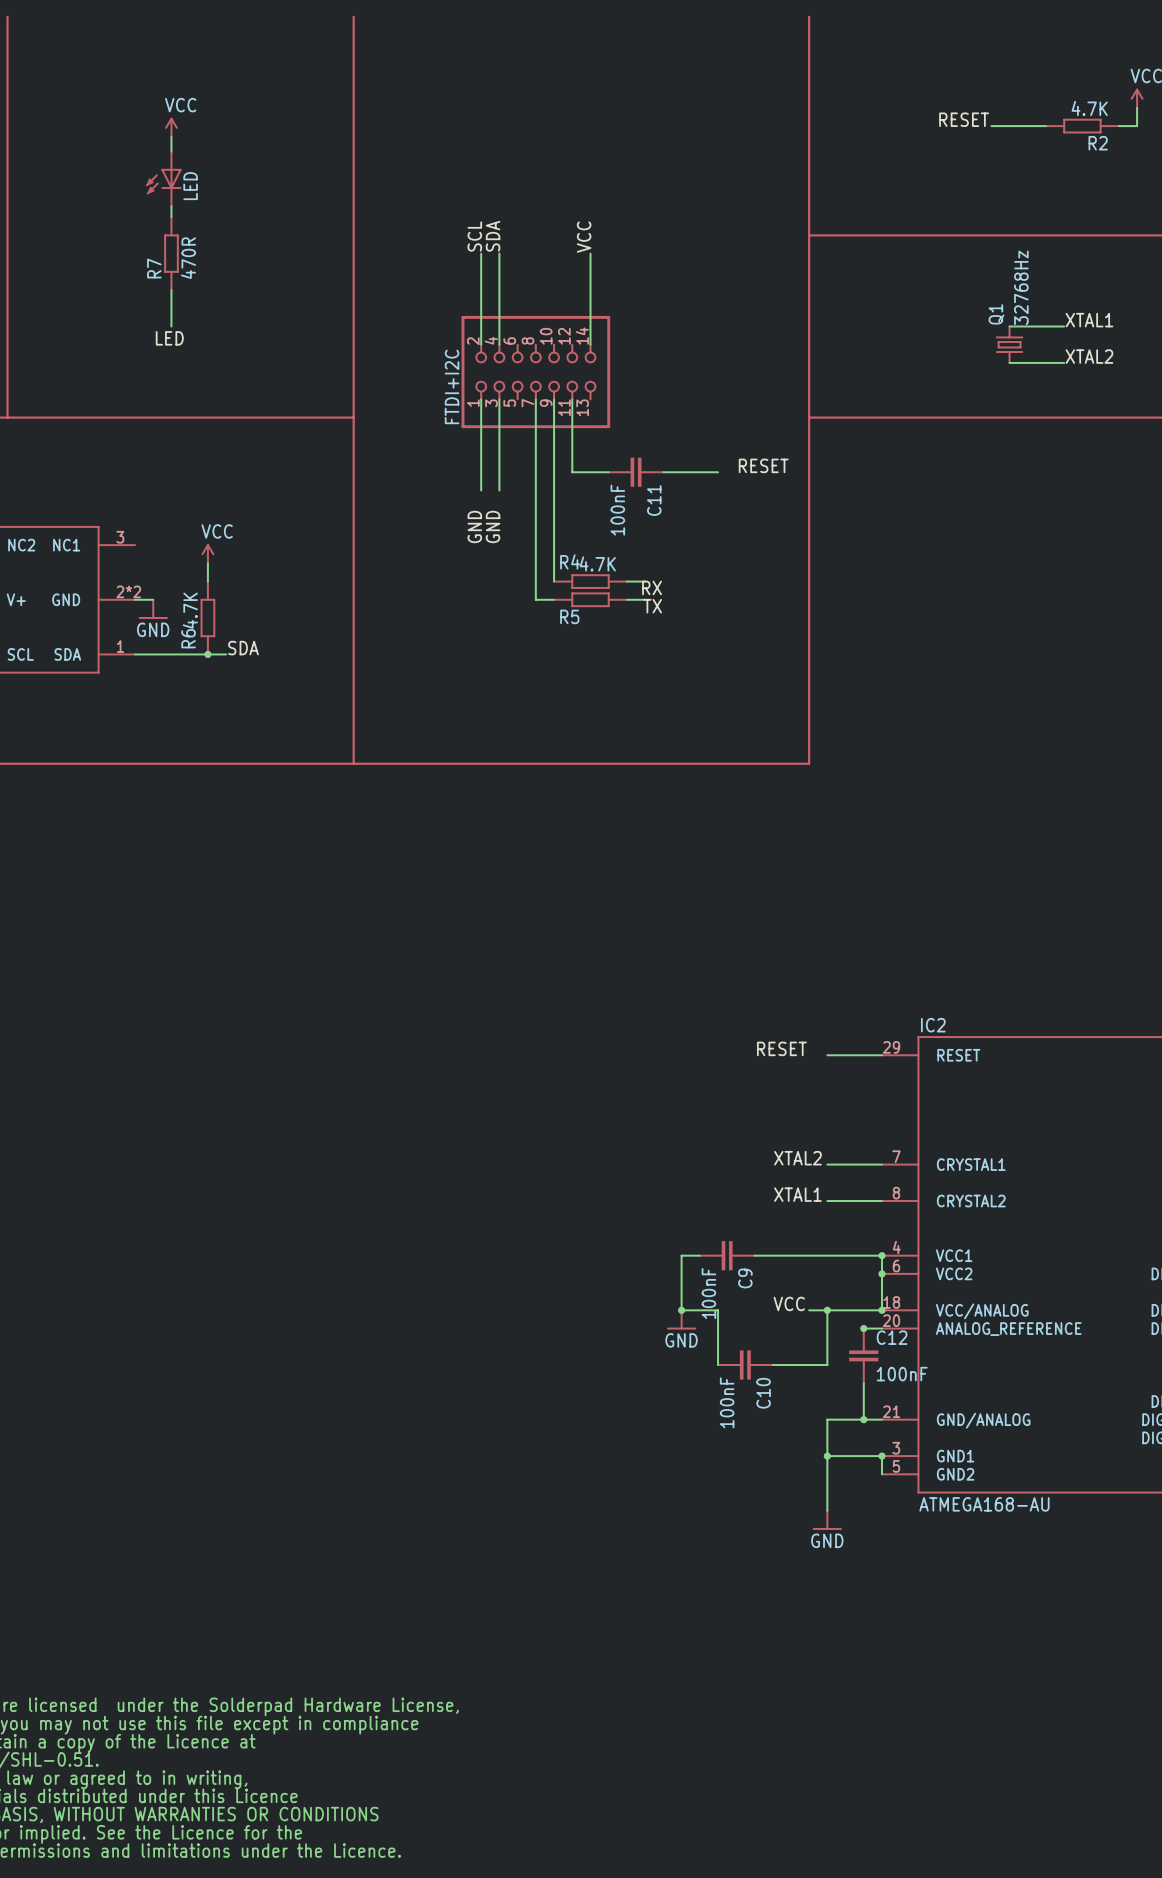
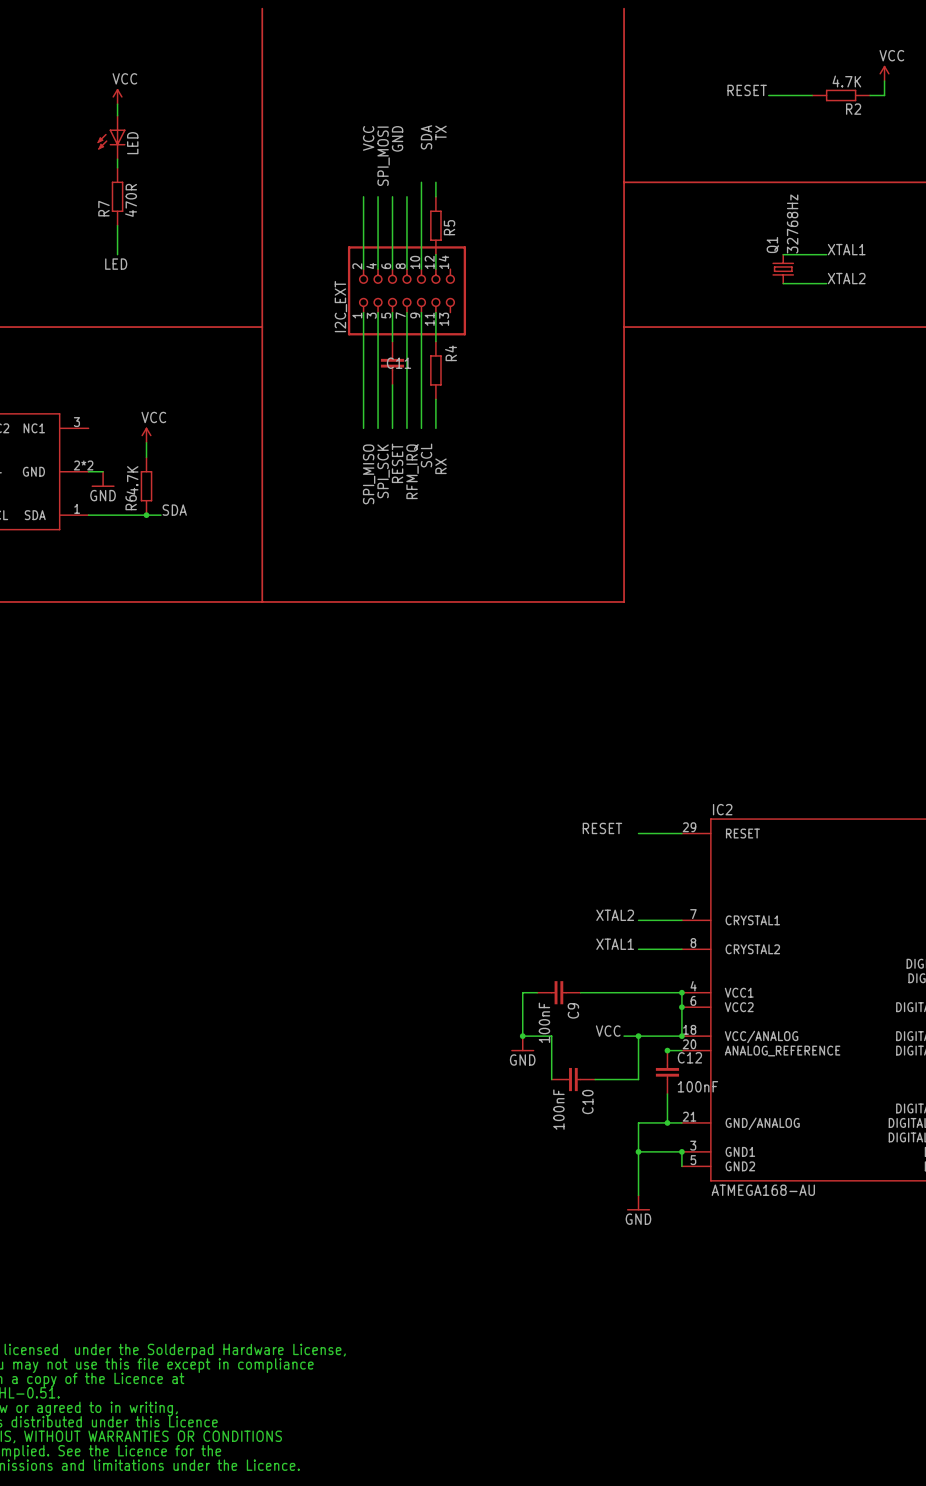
label: none -> TX (440, 133)
label: none -> GND (397, 138)
label: none -> SPI_MOSI (383, 156)
wire: none -> (421, 182) (421, 269)
wire: none -> (435, 182) (435, 196)
label: SCL (474, 236) -> none
label position: SDA (493, 236) -> SDA (426, 137)
label position: VCC (584, 237) -> VCC (368, 138)
wire: none -> (392, 196) (392, 269)
wire: (590, 253) (590, 344) -> (406, 196) (406, 269)
wire: none -> (435, 254) (435, 269)
FTDI+I2C name: FTDI+I2C (452, 386) -> I2C_EXT (340, 306)
wire: none -> (392, 312) (392, 341)
wire: (572, 435) (572, 472) (608, 472) -> none
label: RESET (763, 465) -> none
C11 rotation: 0° (636, 472) -> 90° clockwise (392, 363)
C11 position: (636, 472) -> (392, 363)
wire: (663, 472) (718, 472) -> none
wire: none -> (363, 384) (363, 428)
wire: none -> (378, 384) (378, 428)
wire: none -> (392, 384) (392, 428)
C11 name position: C11 (654, 500) -> C11 (398, 363)
C11 value: 100nF (617, 510) -> none
label: GND (474, 526) -> none
label: GND (493, 526) -> none
wire: (535, 545) (535, 599) (554, 599) -> none
wire: (554, 545) (554, 581) -> (435, 399) (435, 428)
R4 value: 4.7K (597, 563) -> none
label: none -> SCL (426, 455)
R4 rotation: 0° (590, 581) -> 90° clockwise (435, 370)
R4 position: (590, 581) -> (435, 370)
wire: (626, 581) (645, 581) -> none
label rotation: 0° (652, 587) -> 90° counterclockwise (440, 466)
label position: RX (652, 587) -> RX (440, 466)
label: none -> RESET (397, 463)
label: none -> SPI_SCK (383, 471)
label: none -> RFM_IRQ (412, 471)
R5 rotation: 0° (590, 599) -> 90° clockwise (435, 225)
R5 position: (590, 599) -> (435, 225)
wire: (626, 599) (645, 599) -> none
label: none -> SPI_MISO (369, 474)
label: TX (652, 606) -> none
R5 name position: R5 (569, 616) -> R5 (449, 227)

